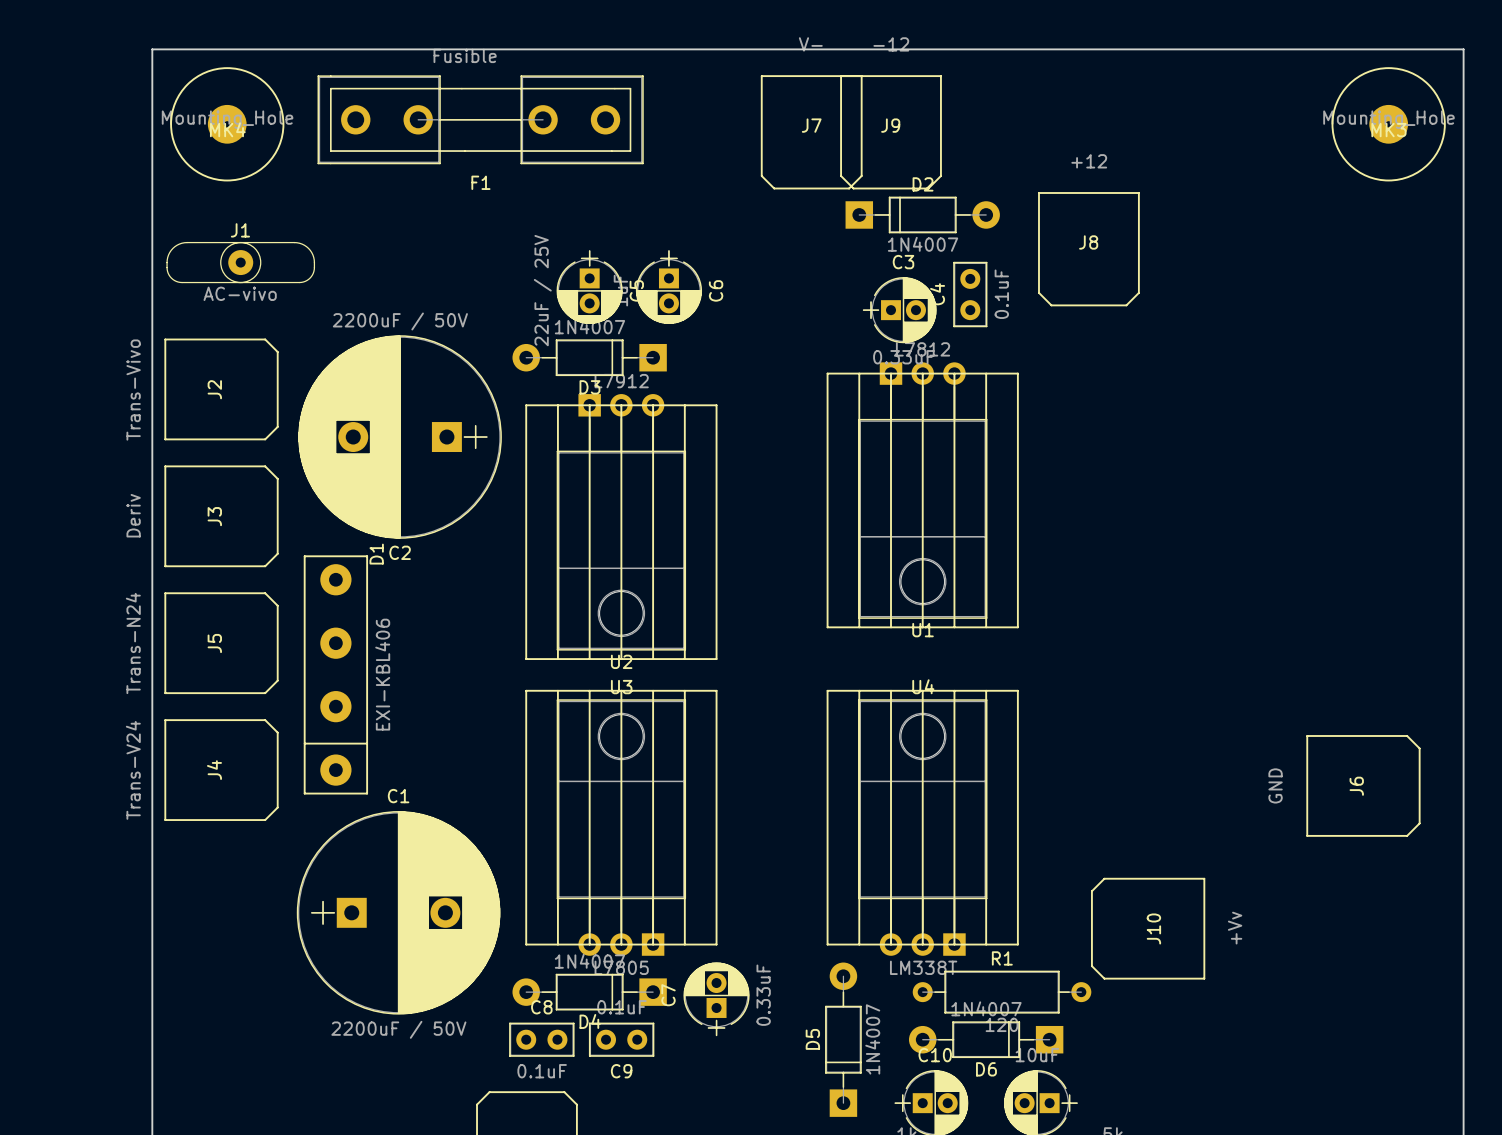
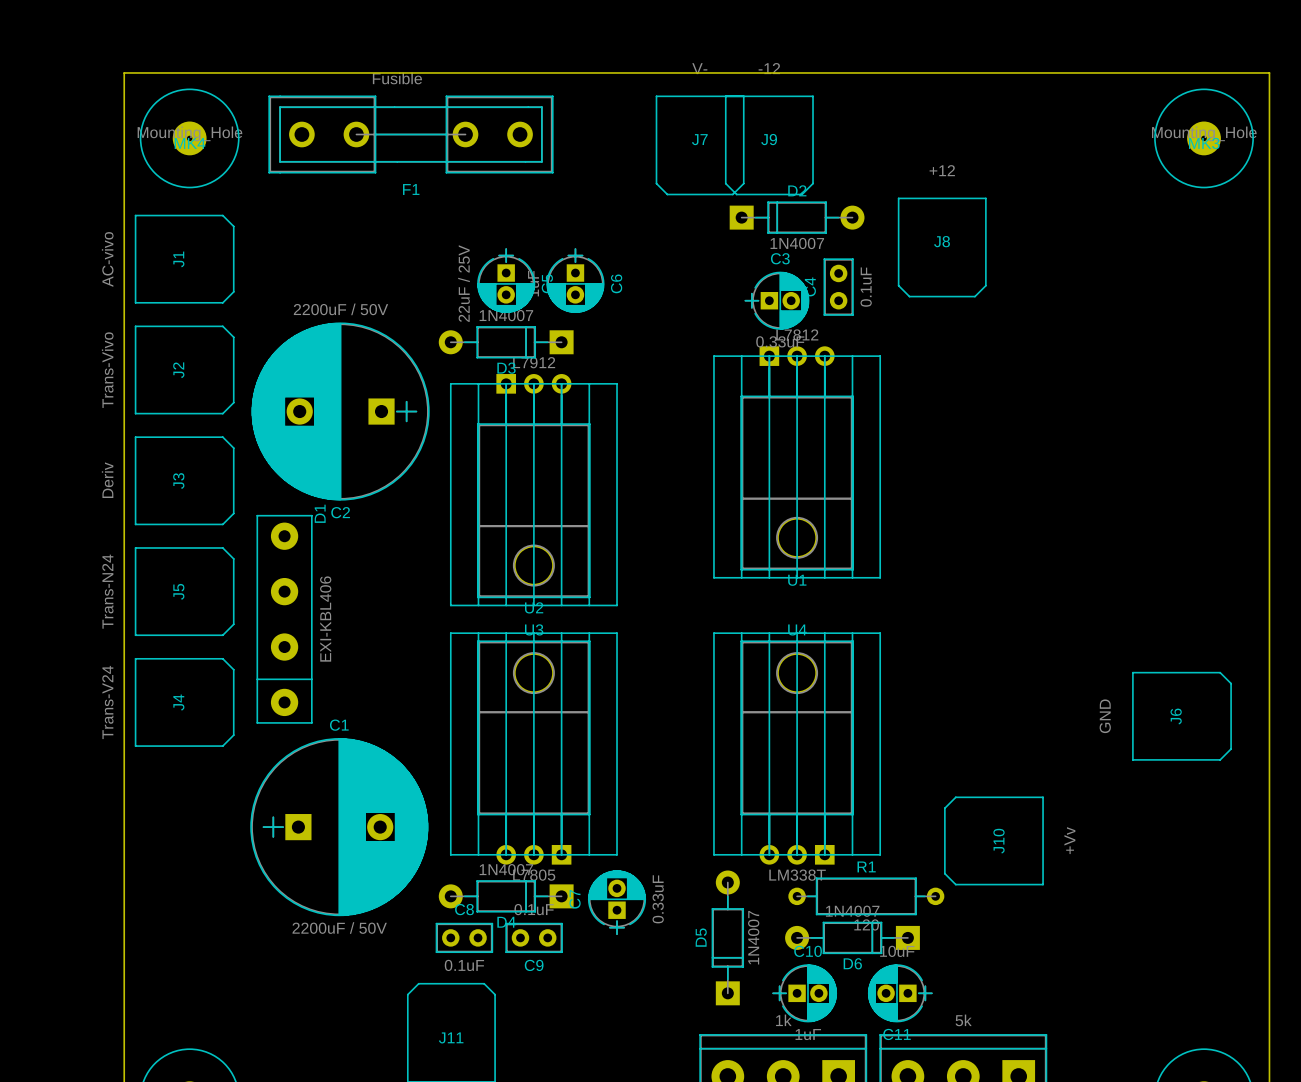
J1 name position: J1 (240, 230) -> J1 (178, 259)
J1 footprint: [166, 241, 316, 284] -> [134, 214, 235, 304]
J1 value position: AC-vivo (240, 293) -> AC-vivo (107, 259)

